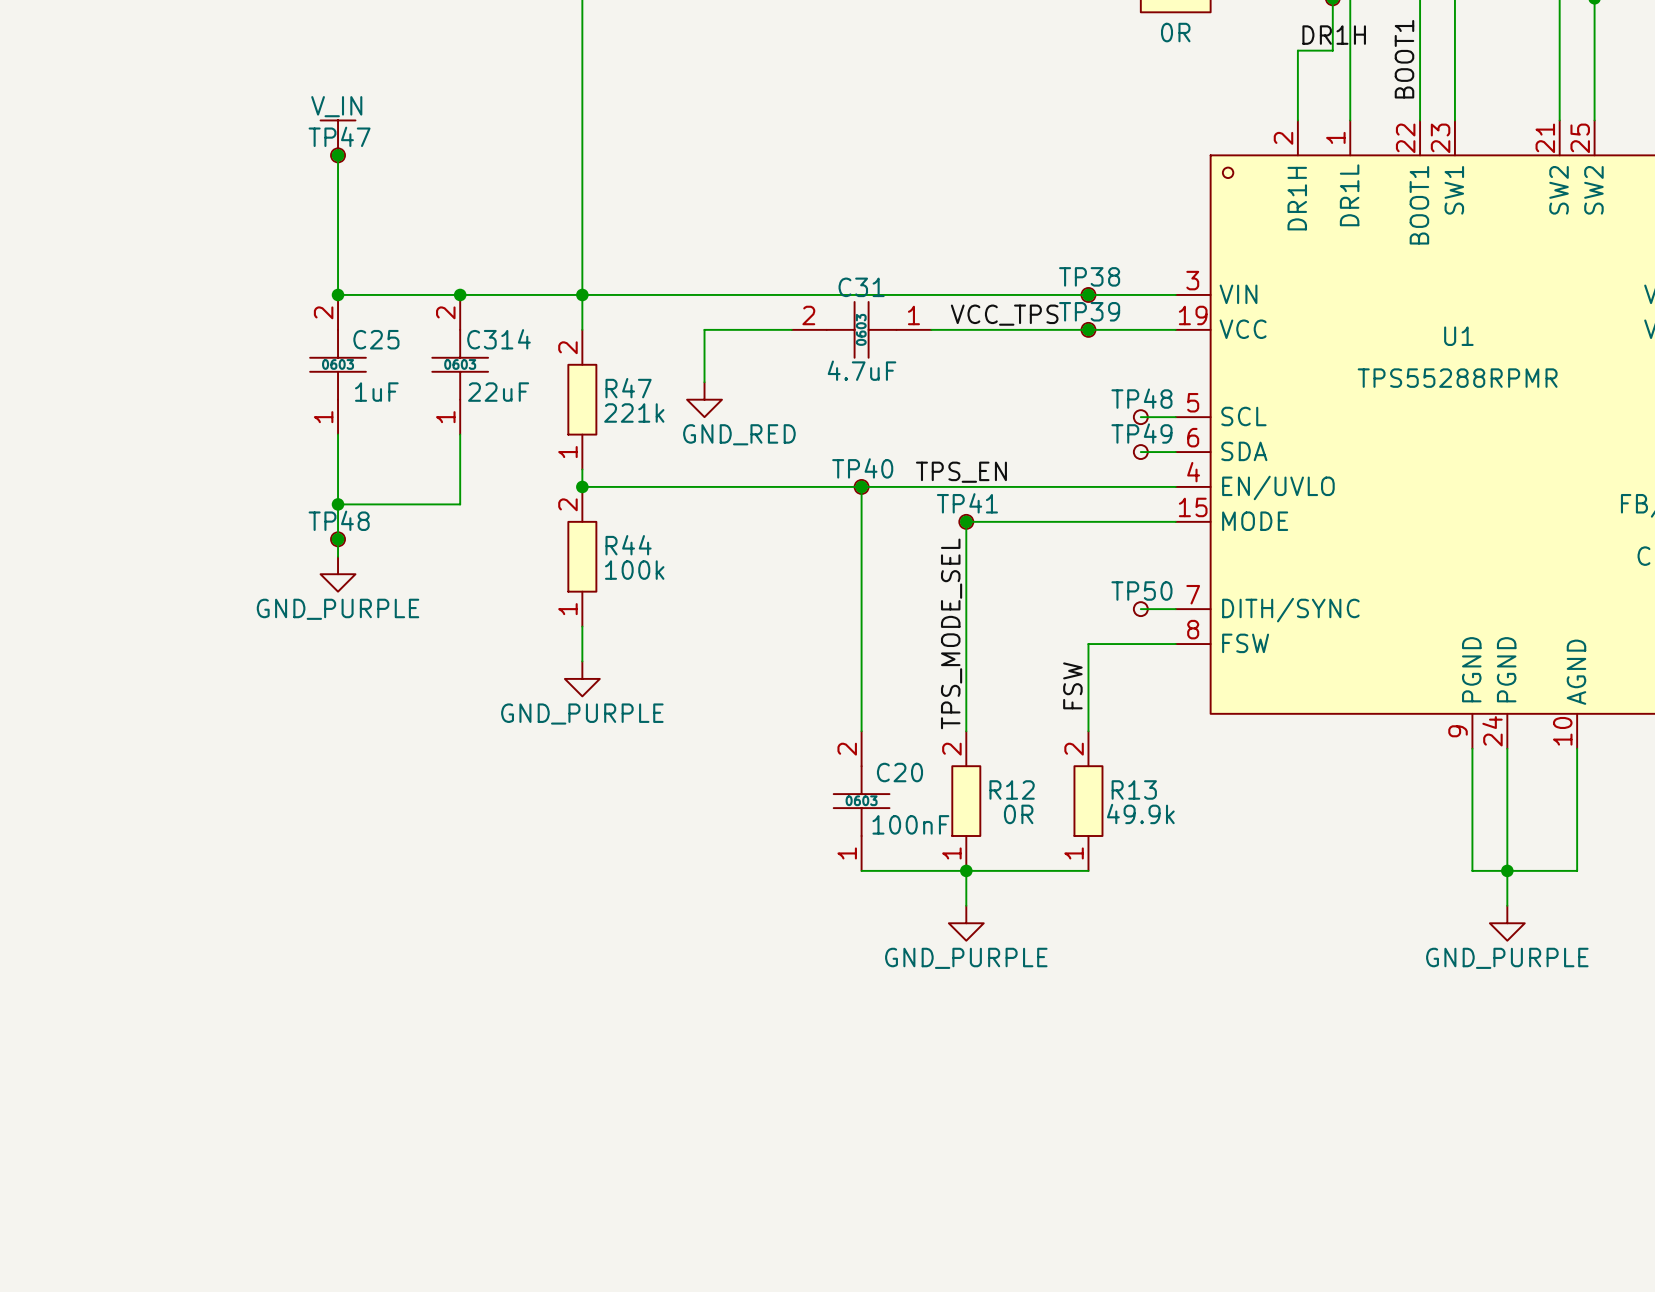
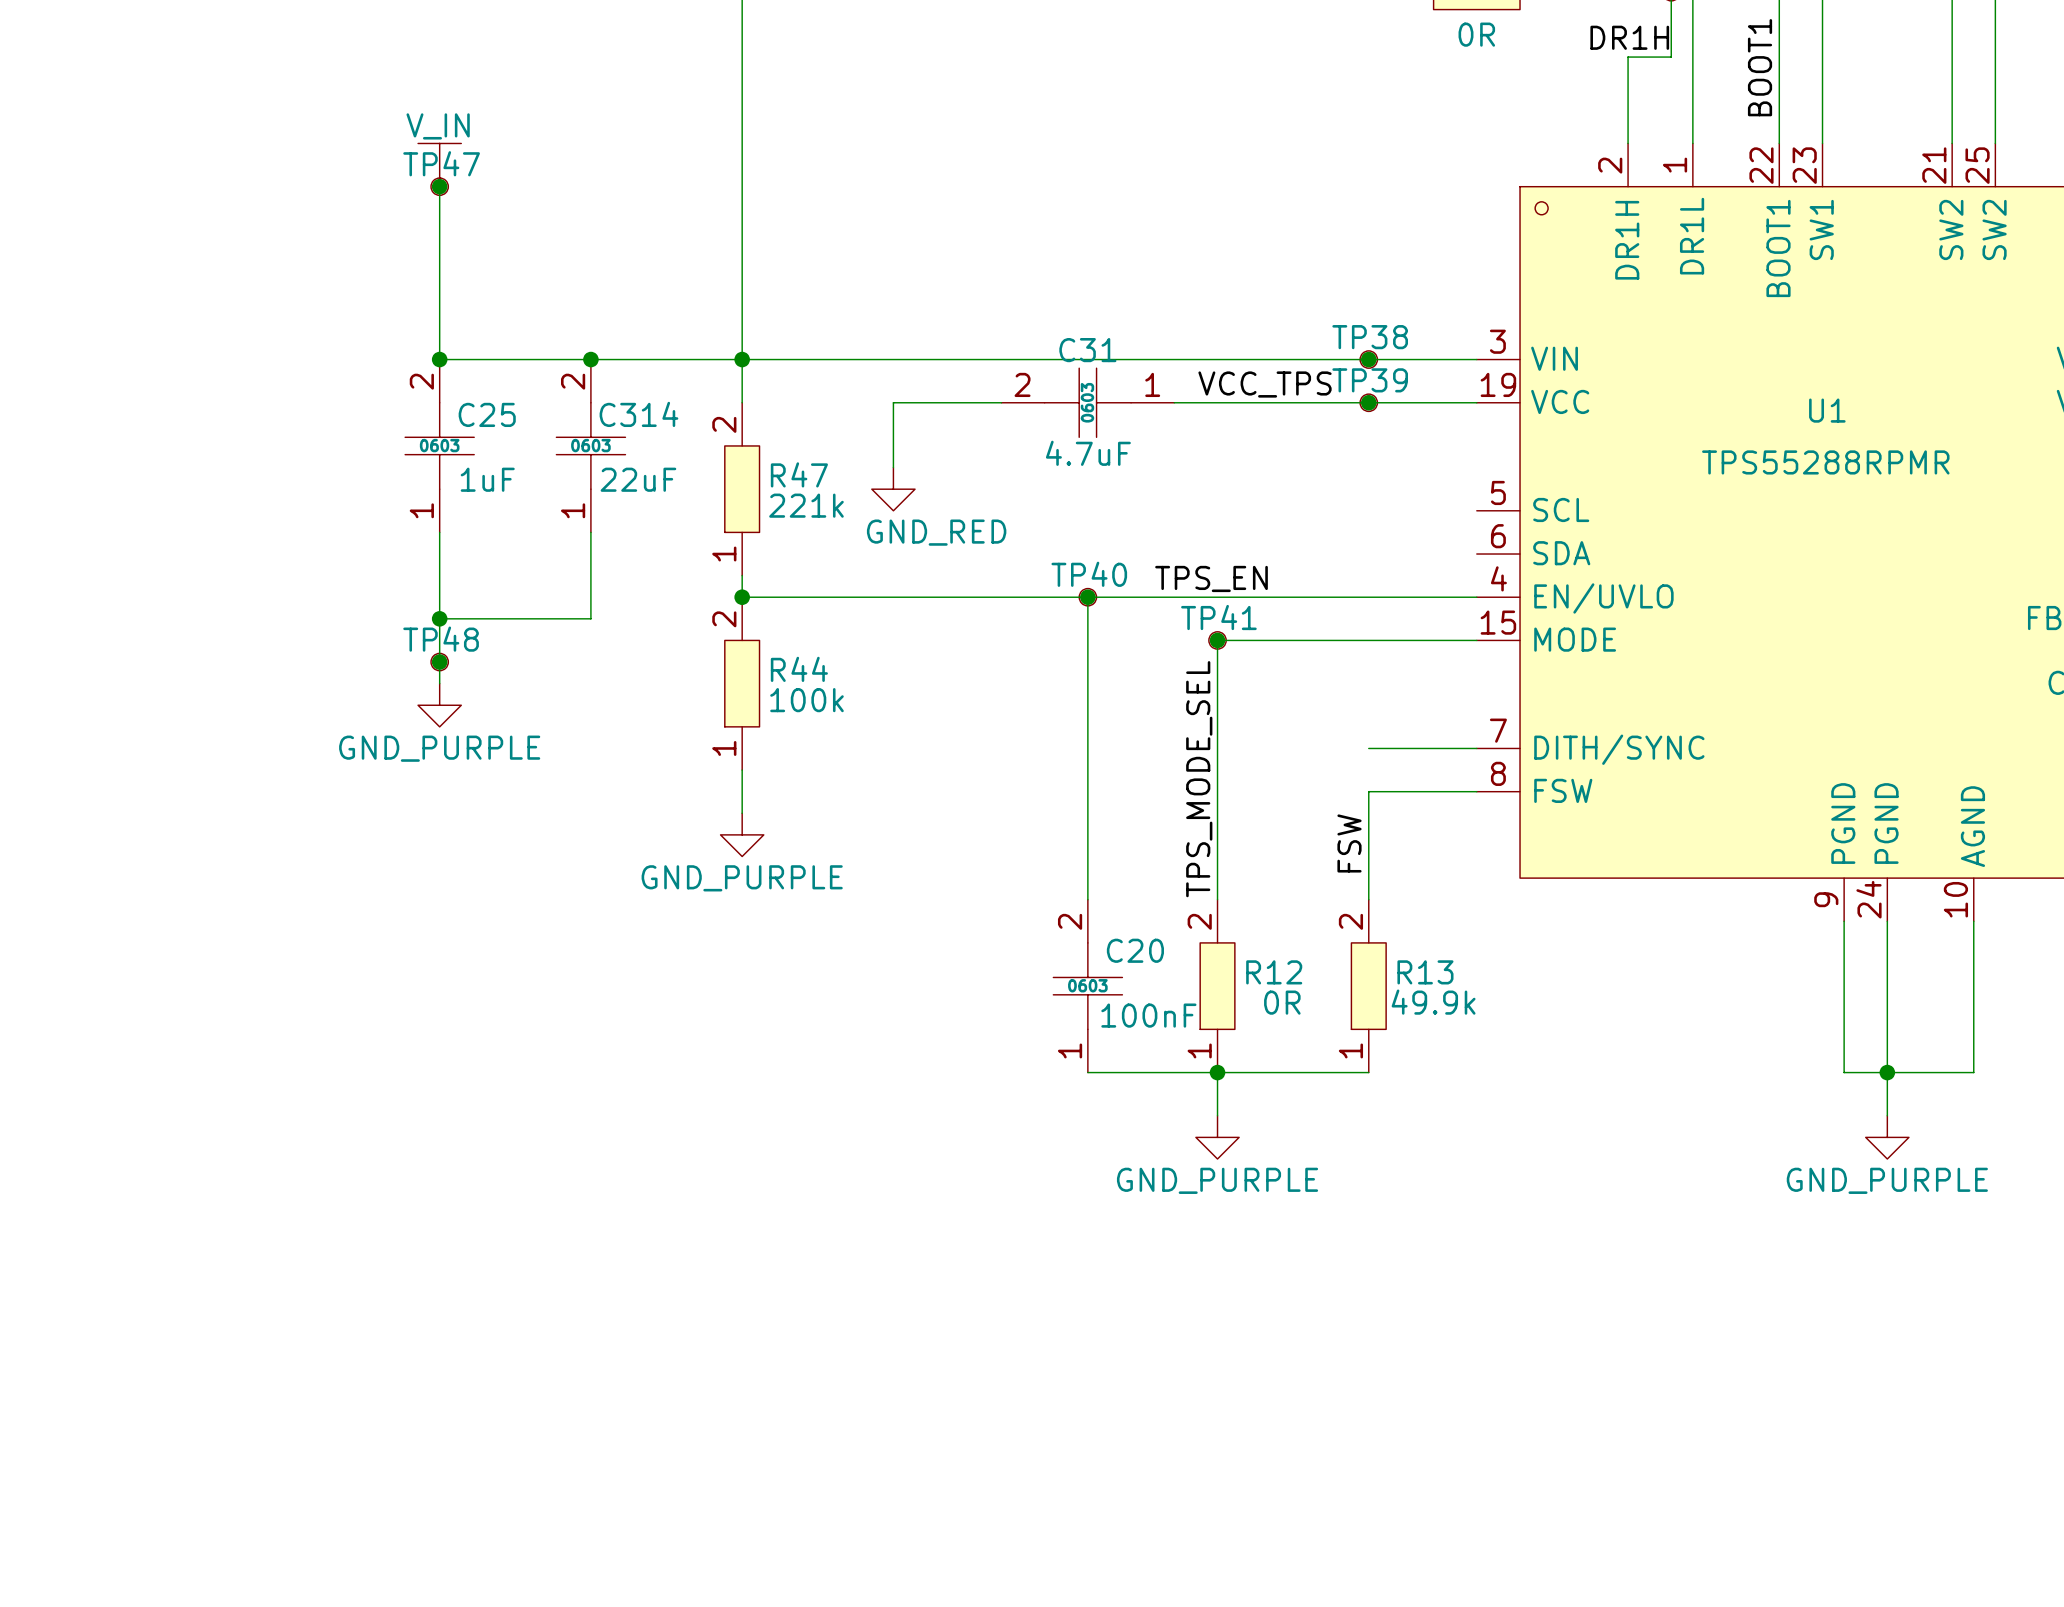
label position: DR1H (1334, 35) -> DR1H (1629, 37)
wire: (1140, 417) (1175, 417) -> none
TP48: (1140, 417) -> none
wire: (1140, 452) (1175, 452) -> none
TP49: (1140, 452) -> none
wire: none -> (1368, 748) (1433, 748)
TP50: (1140, 609) -> none

